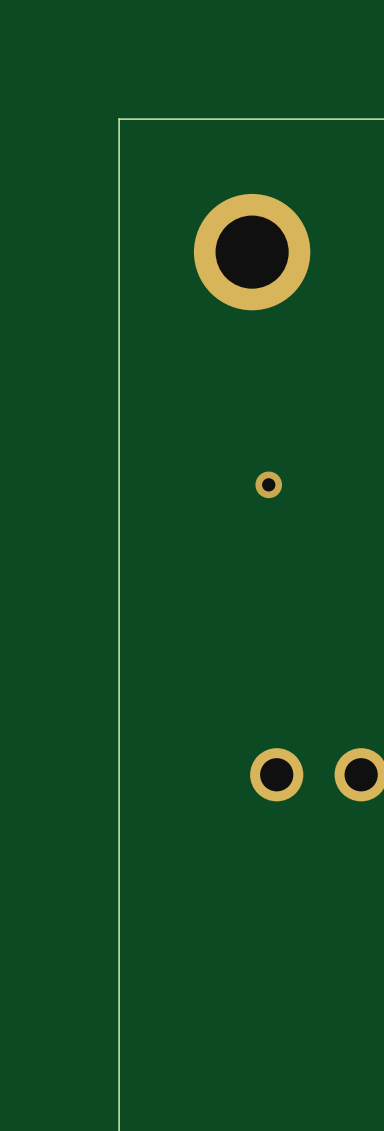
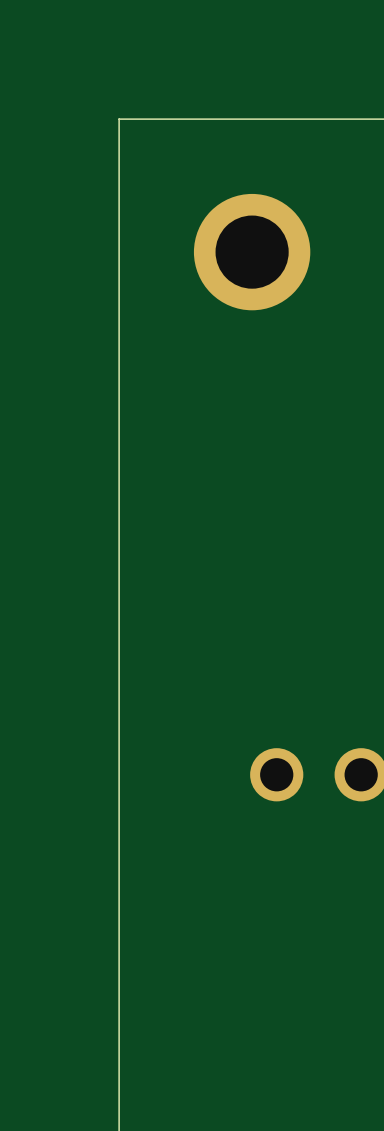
via: (268, 484) -> none

